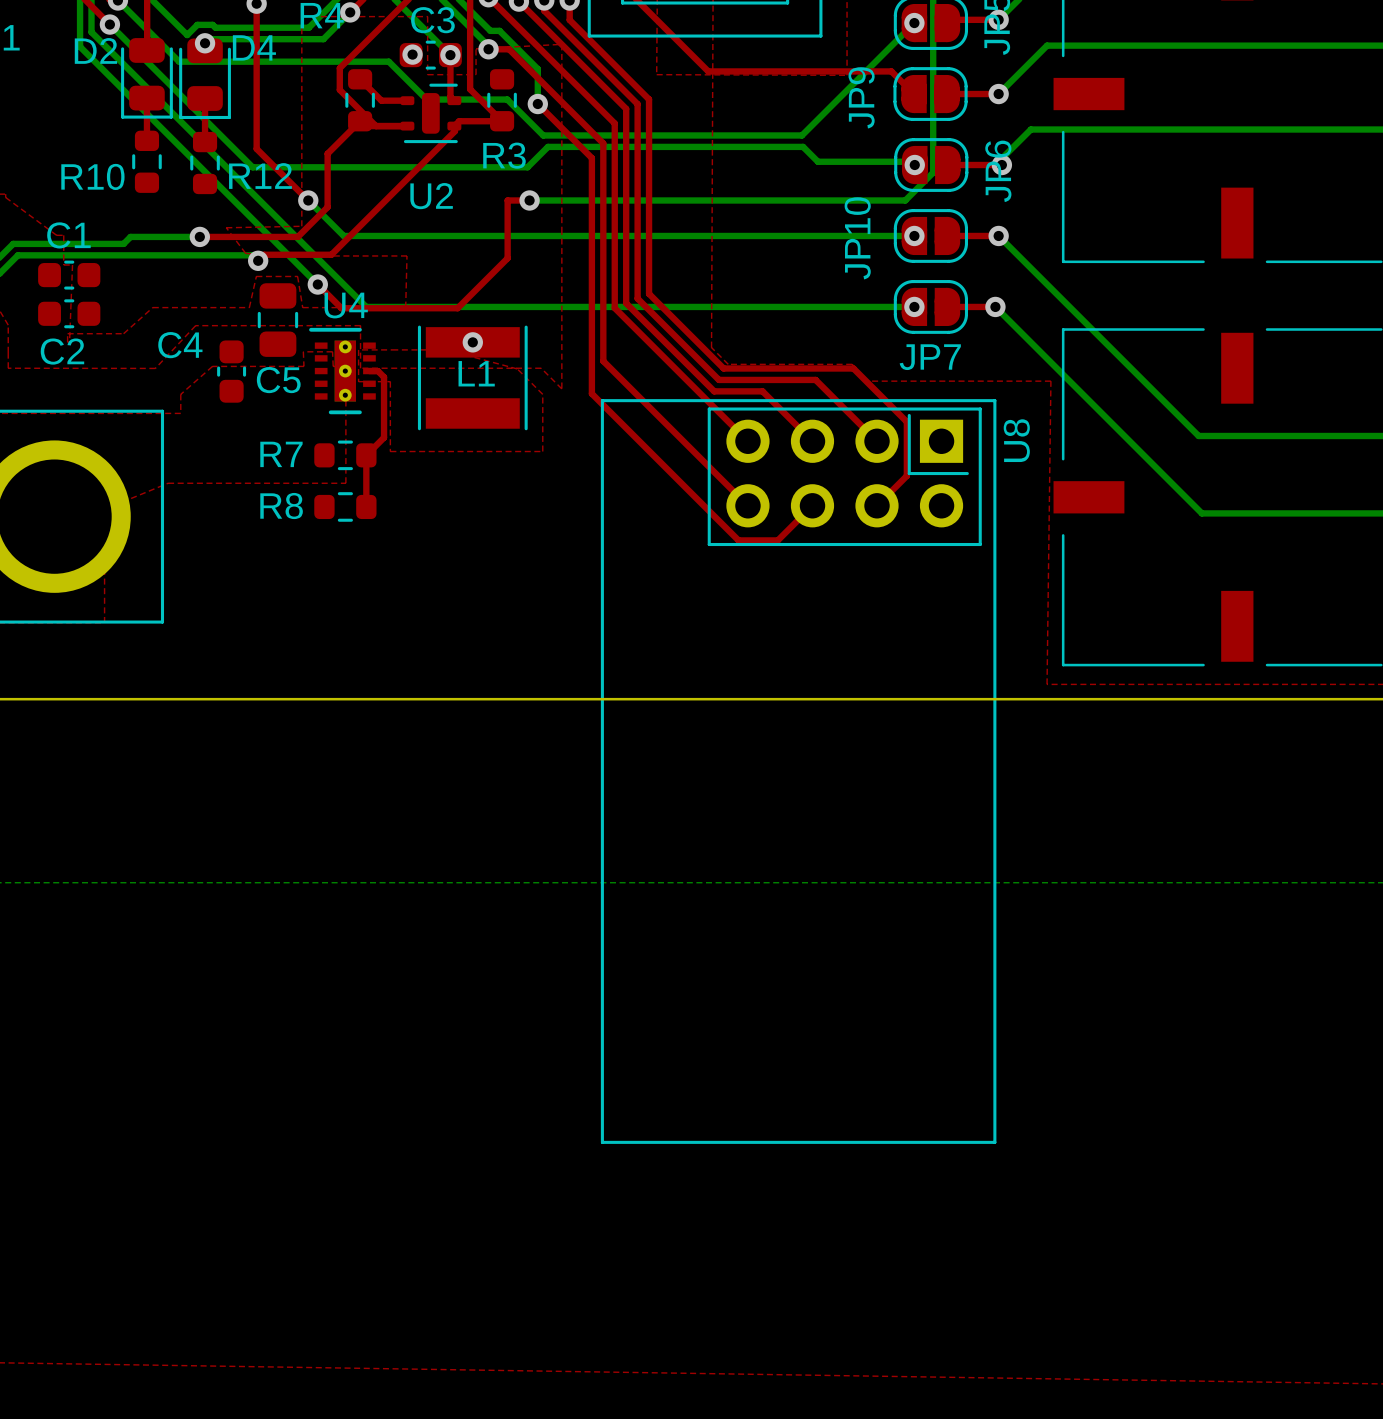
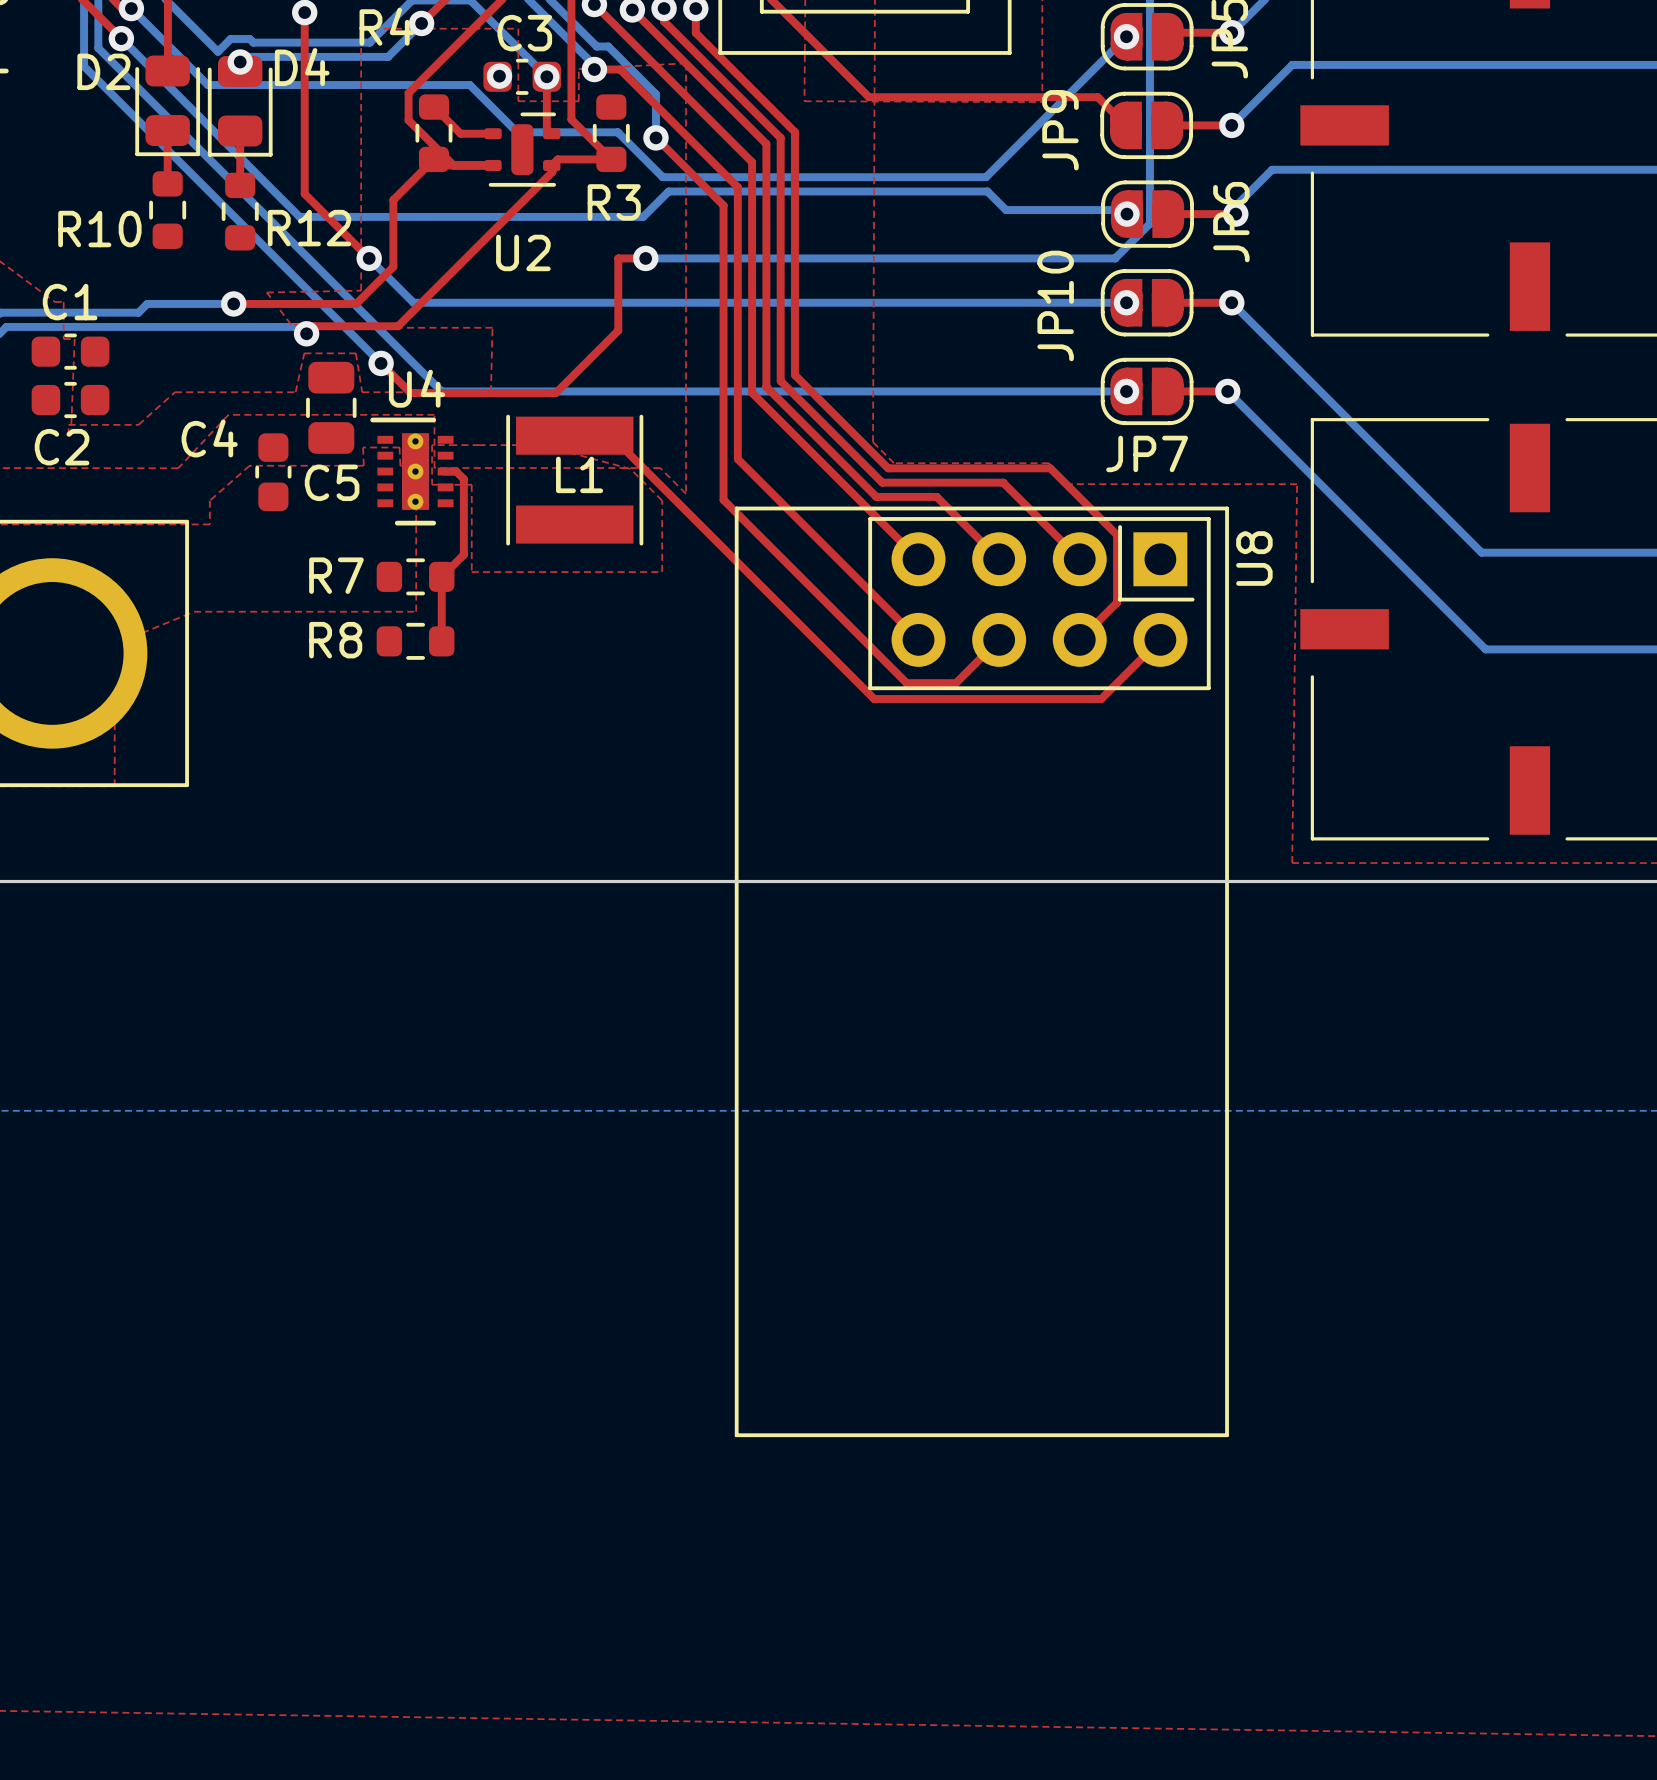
top track: none -> (574, 435) (610, 435) (874, 699) (1101, 699) (1160, 639)
via: (472, 342) -> none

